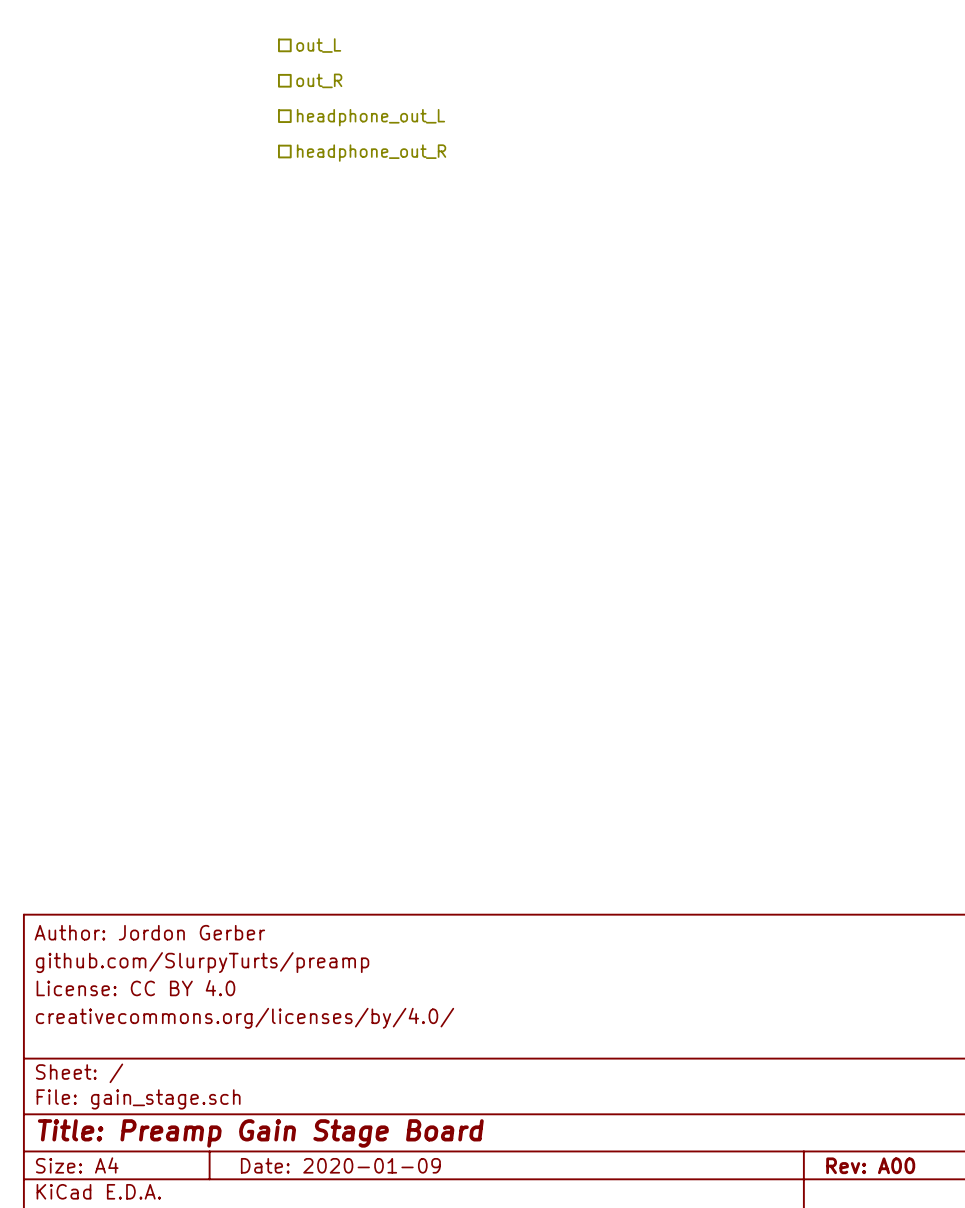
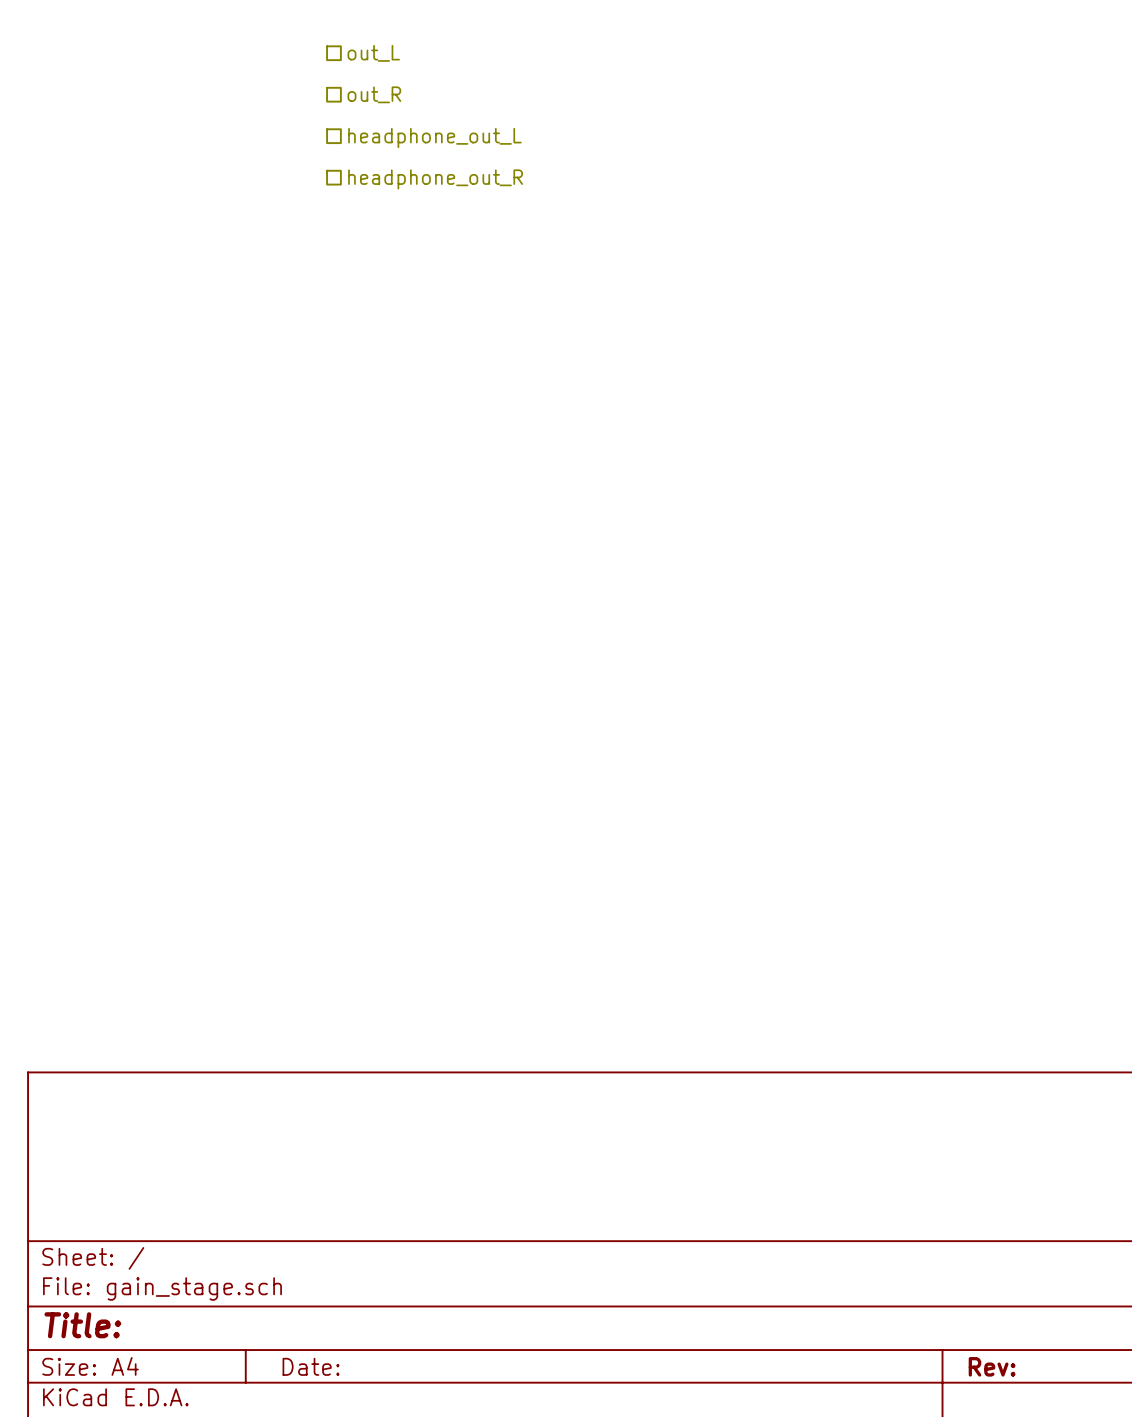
title block: Author: Jordon Gerber (149, 932) -> none
title block: github.com/SlurpyTurts/preamp (202, 962) -> none
title block: License: CC BY 4.0 (135, 988) -> none
title block: creativecommons.org/licenses/by/4.0/ (245, 1018) -> none
title block: Title: Preamp Gain Stage Board (260, 1133) -> Title: (82, 1325)
title block: Date: 2020-01-09 (340, 1165) -> Date: (311, 1366)
title block: Rev: A00 (870, 1165) -> Rev: (992, 1366)

